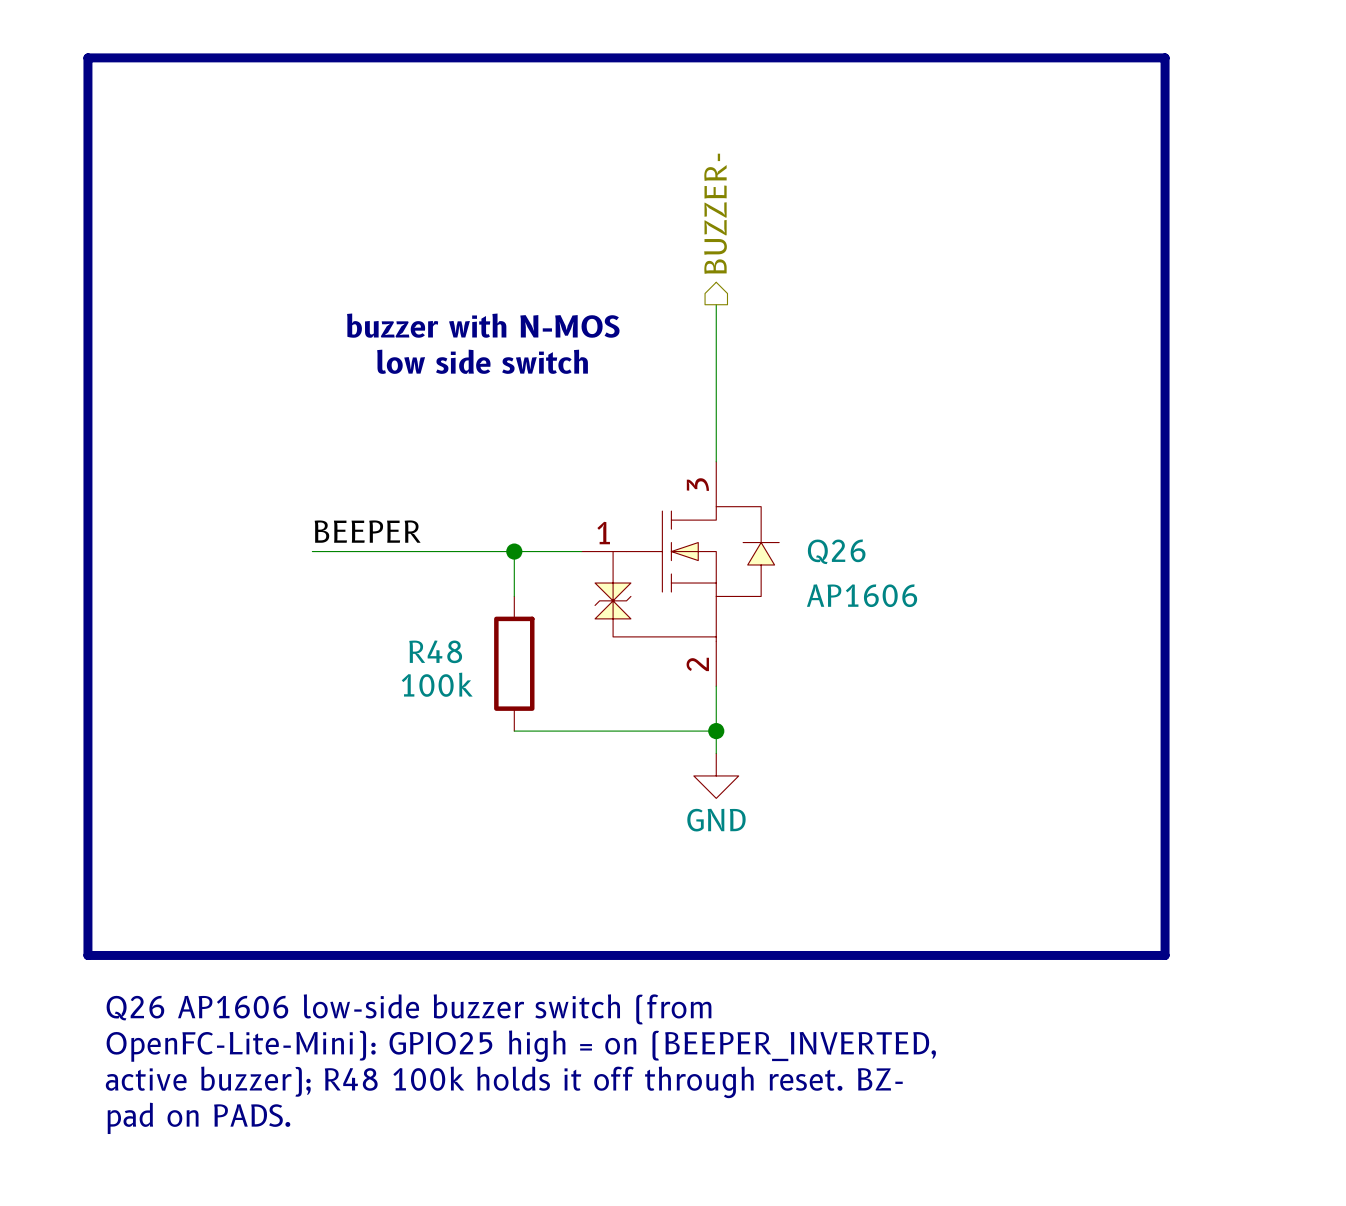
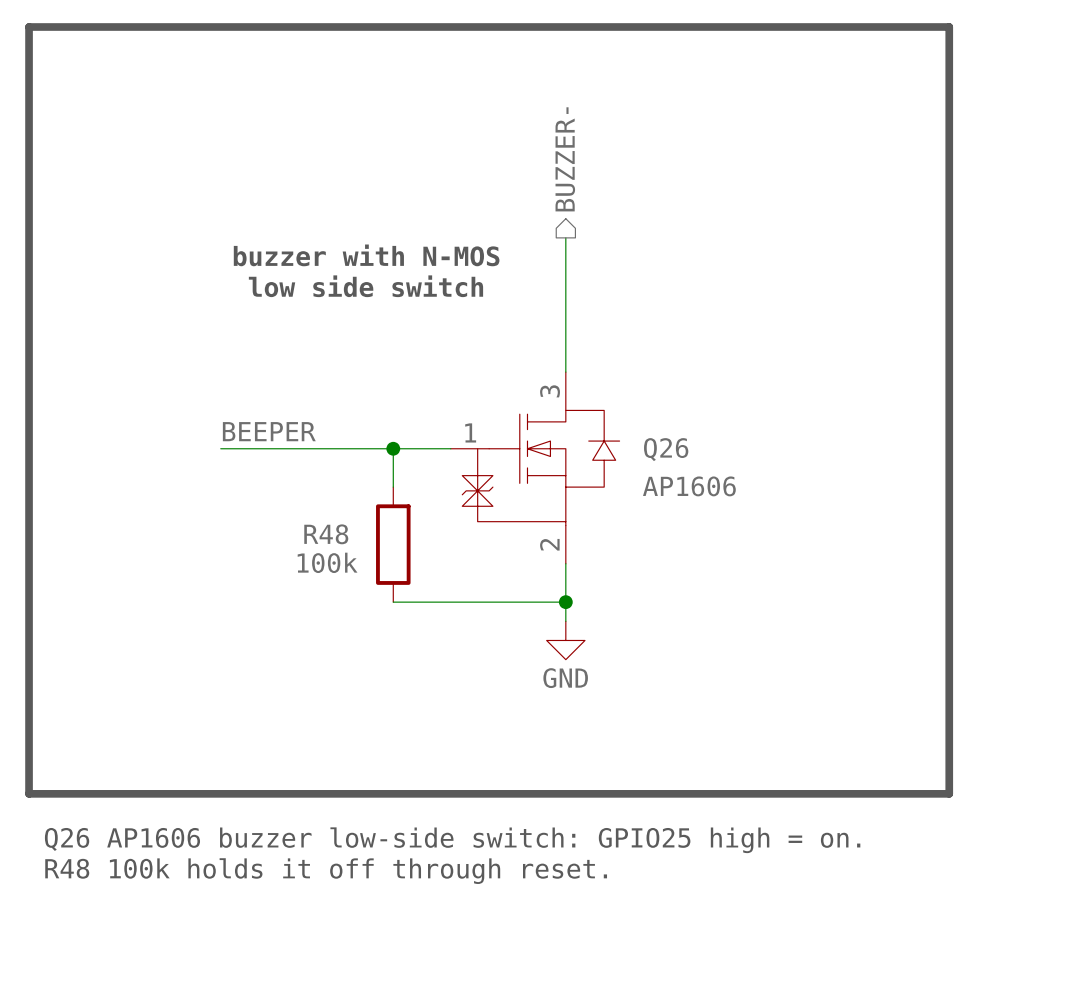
text: Q26 AP1606 low-side buzzer switch (from (409, 1009) -> Q26 AP1606 buzzer low-side switch: GPIO25 high = on. (452, 840)
text: OpenFC-Lite-Mini): GPIO25 high = on (BEEPER_INVERTED, (521, 1046) -> R48 100k holds it off through reset. (326, 871)
text: active buzzer); R48 100k holds it off through reset. BZ- (504, 1082) -> none
text: pad on PADS. (199, 1118) -> none

